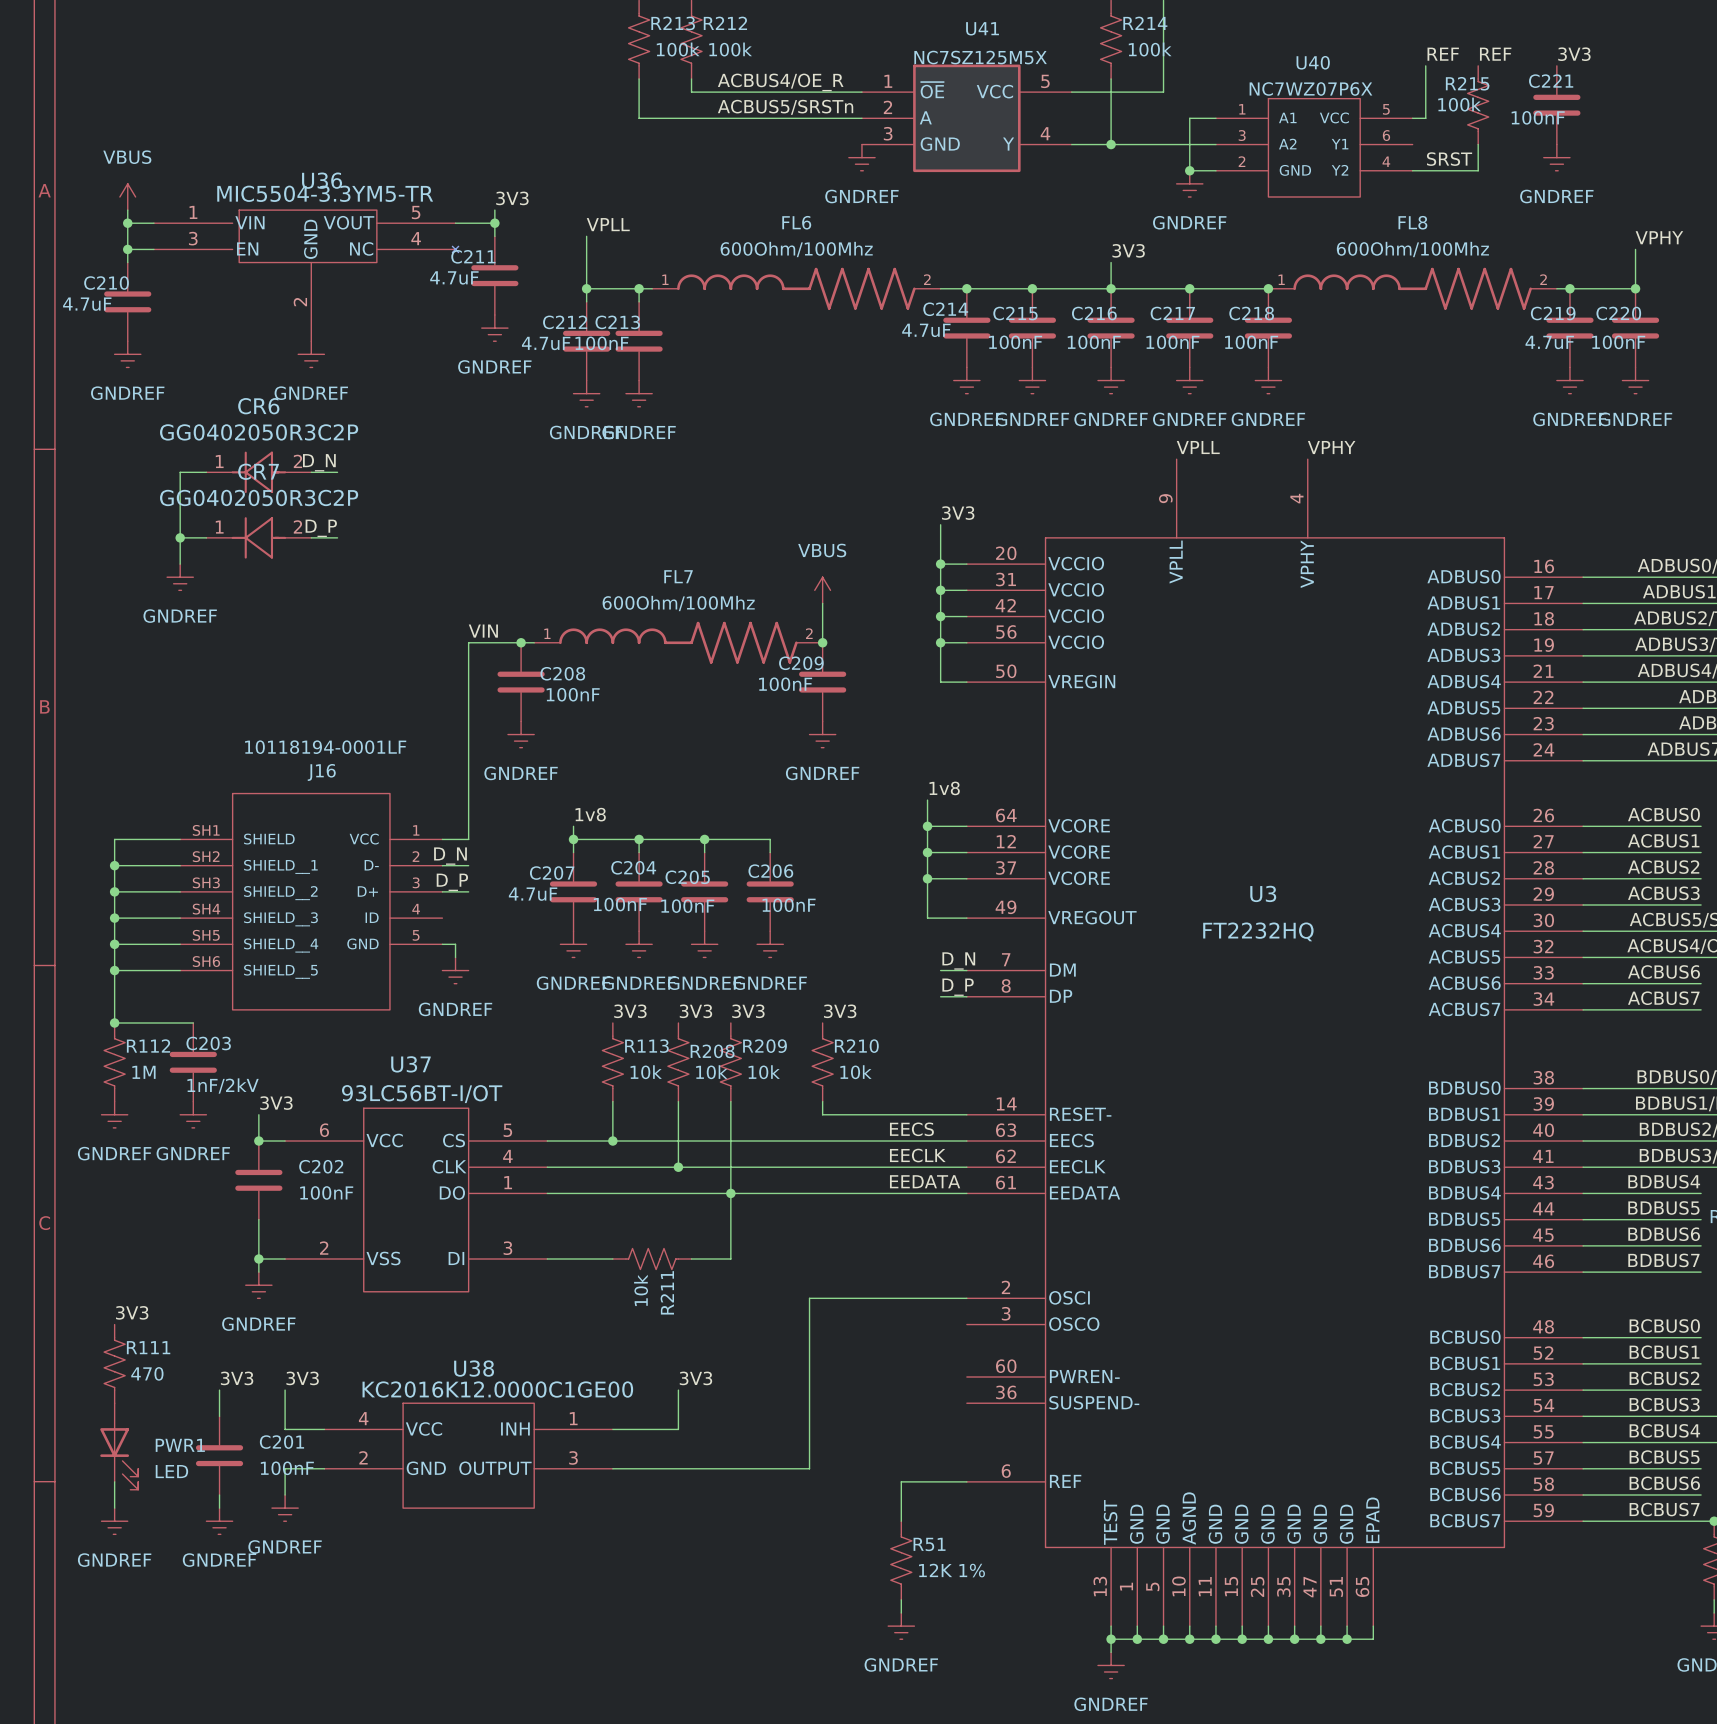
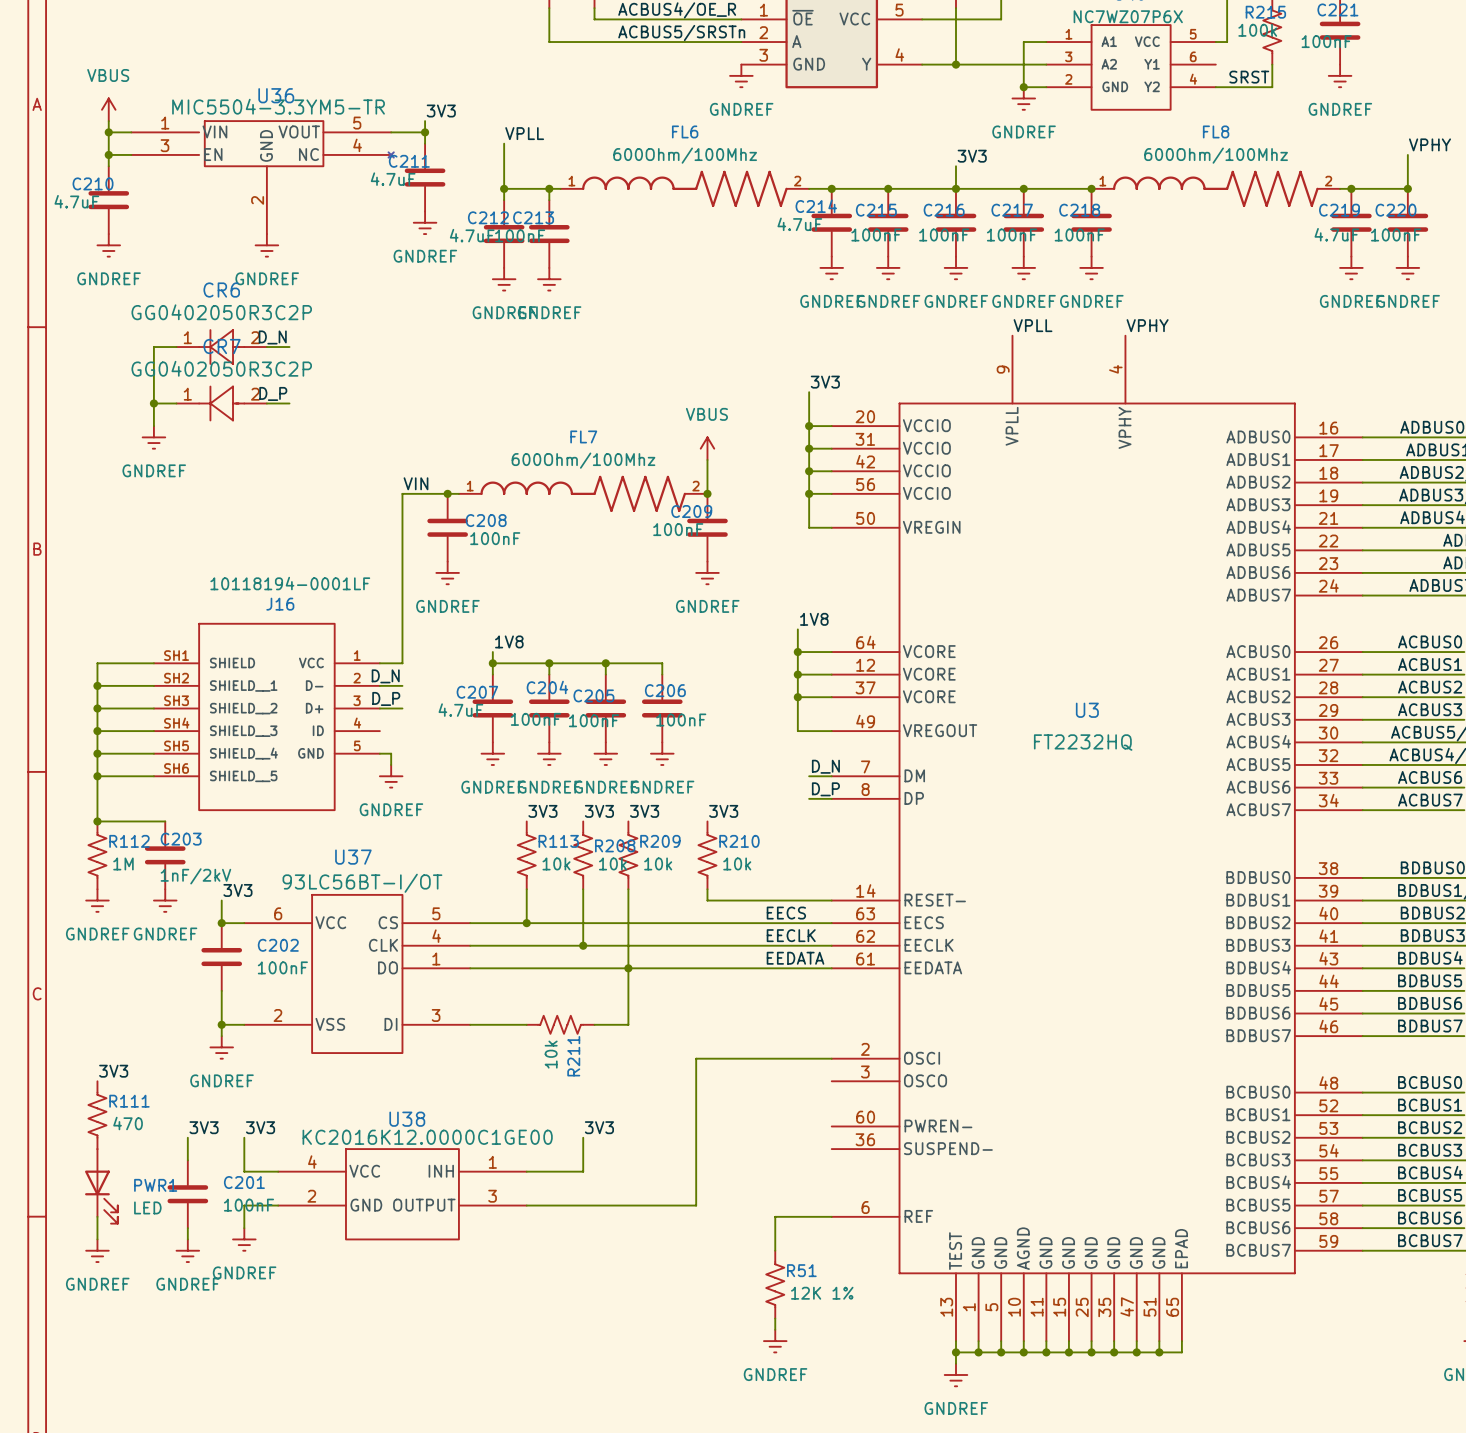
label: 1v8 (944, 788) -> 1V8 (814, 619)
label: 1v8 (590, 814) -> 1V8 (509, 641)

